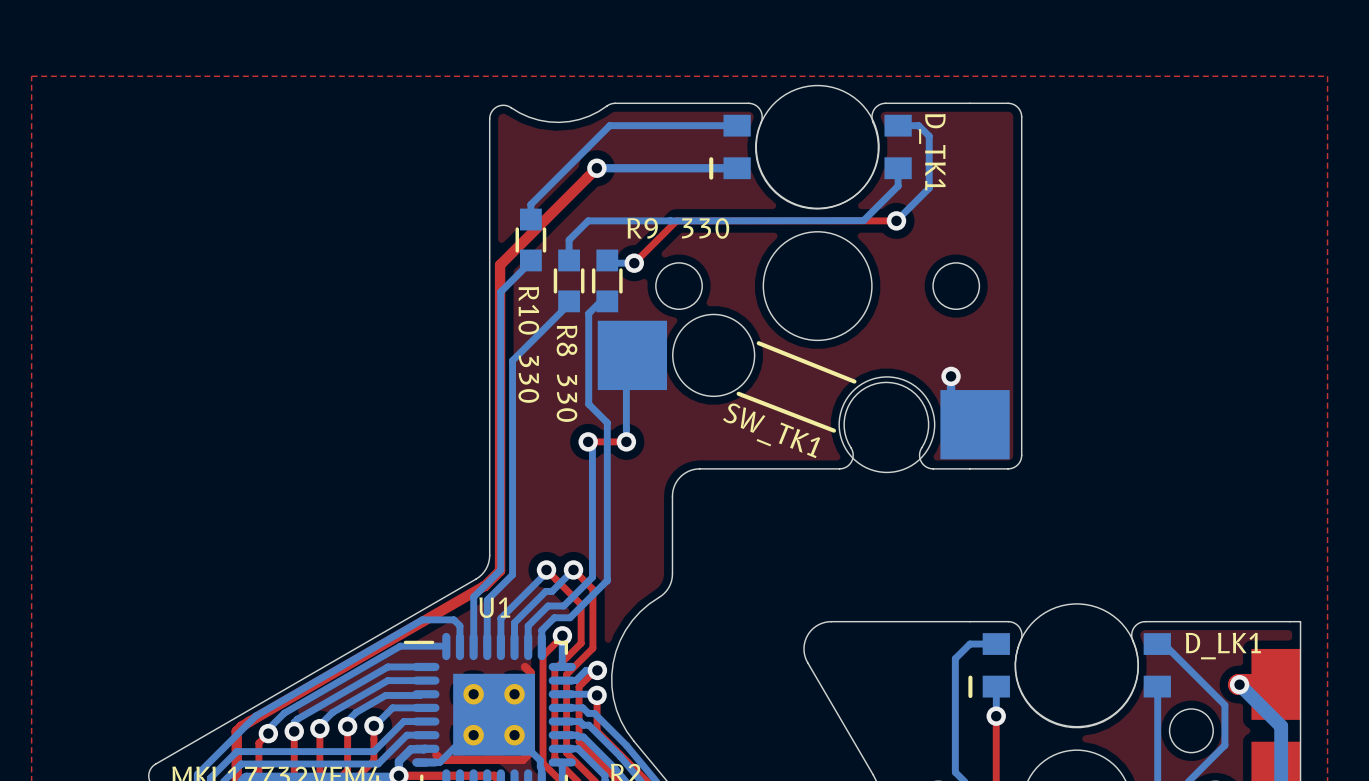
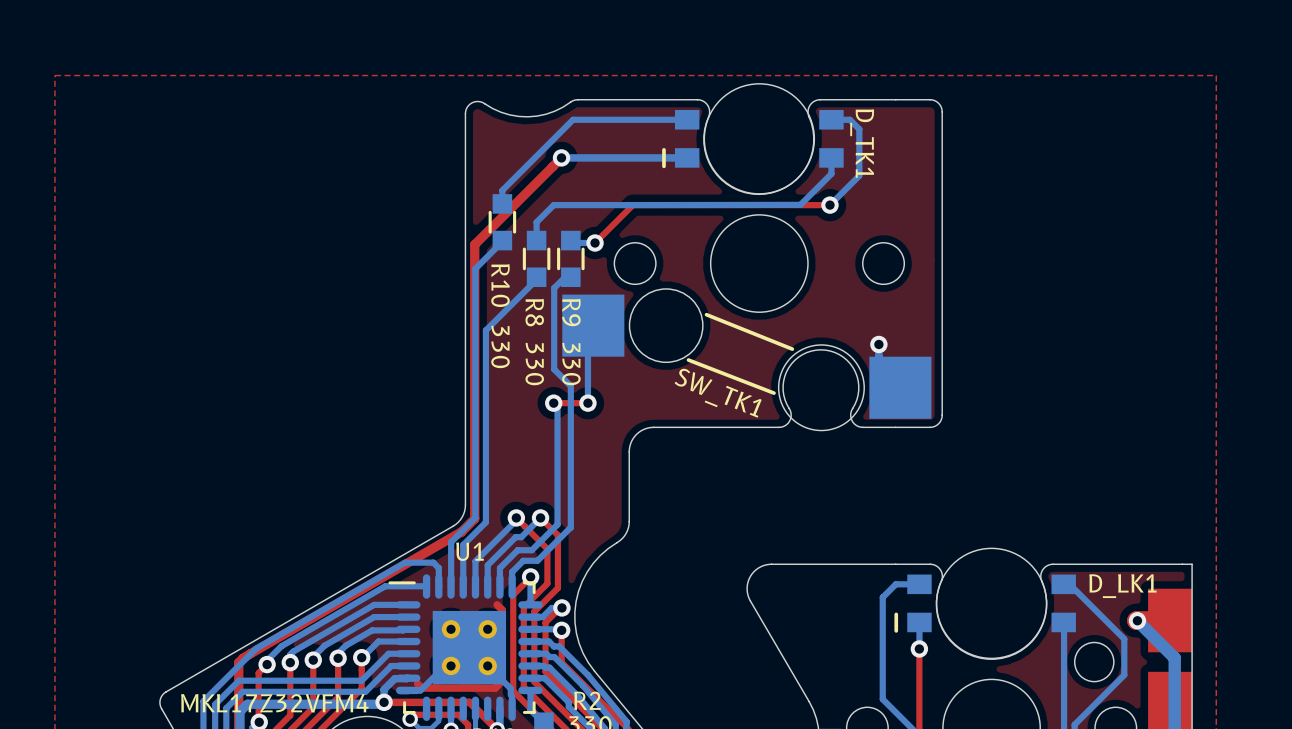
R9 name rotation: 0° (642, 228) -> 90° clockwise (571, 312)
R9 name position: R9 (642, 228) -> R9 (571, 312)
R9 value rotation: 0° (705, 228) -> 90° clockwise (571, 364)
R9 value position: 330 (705, 228) -> 330 (571, 364)

